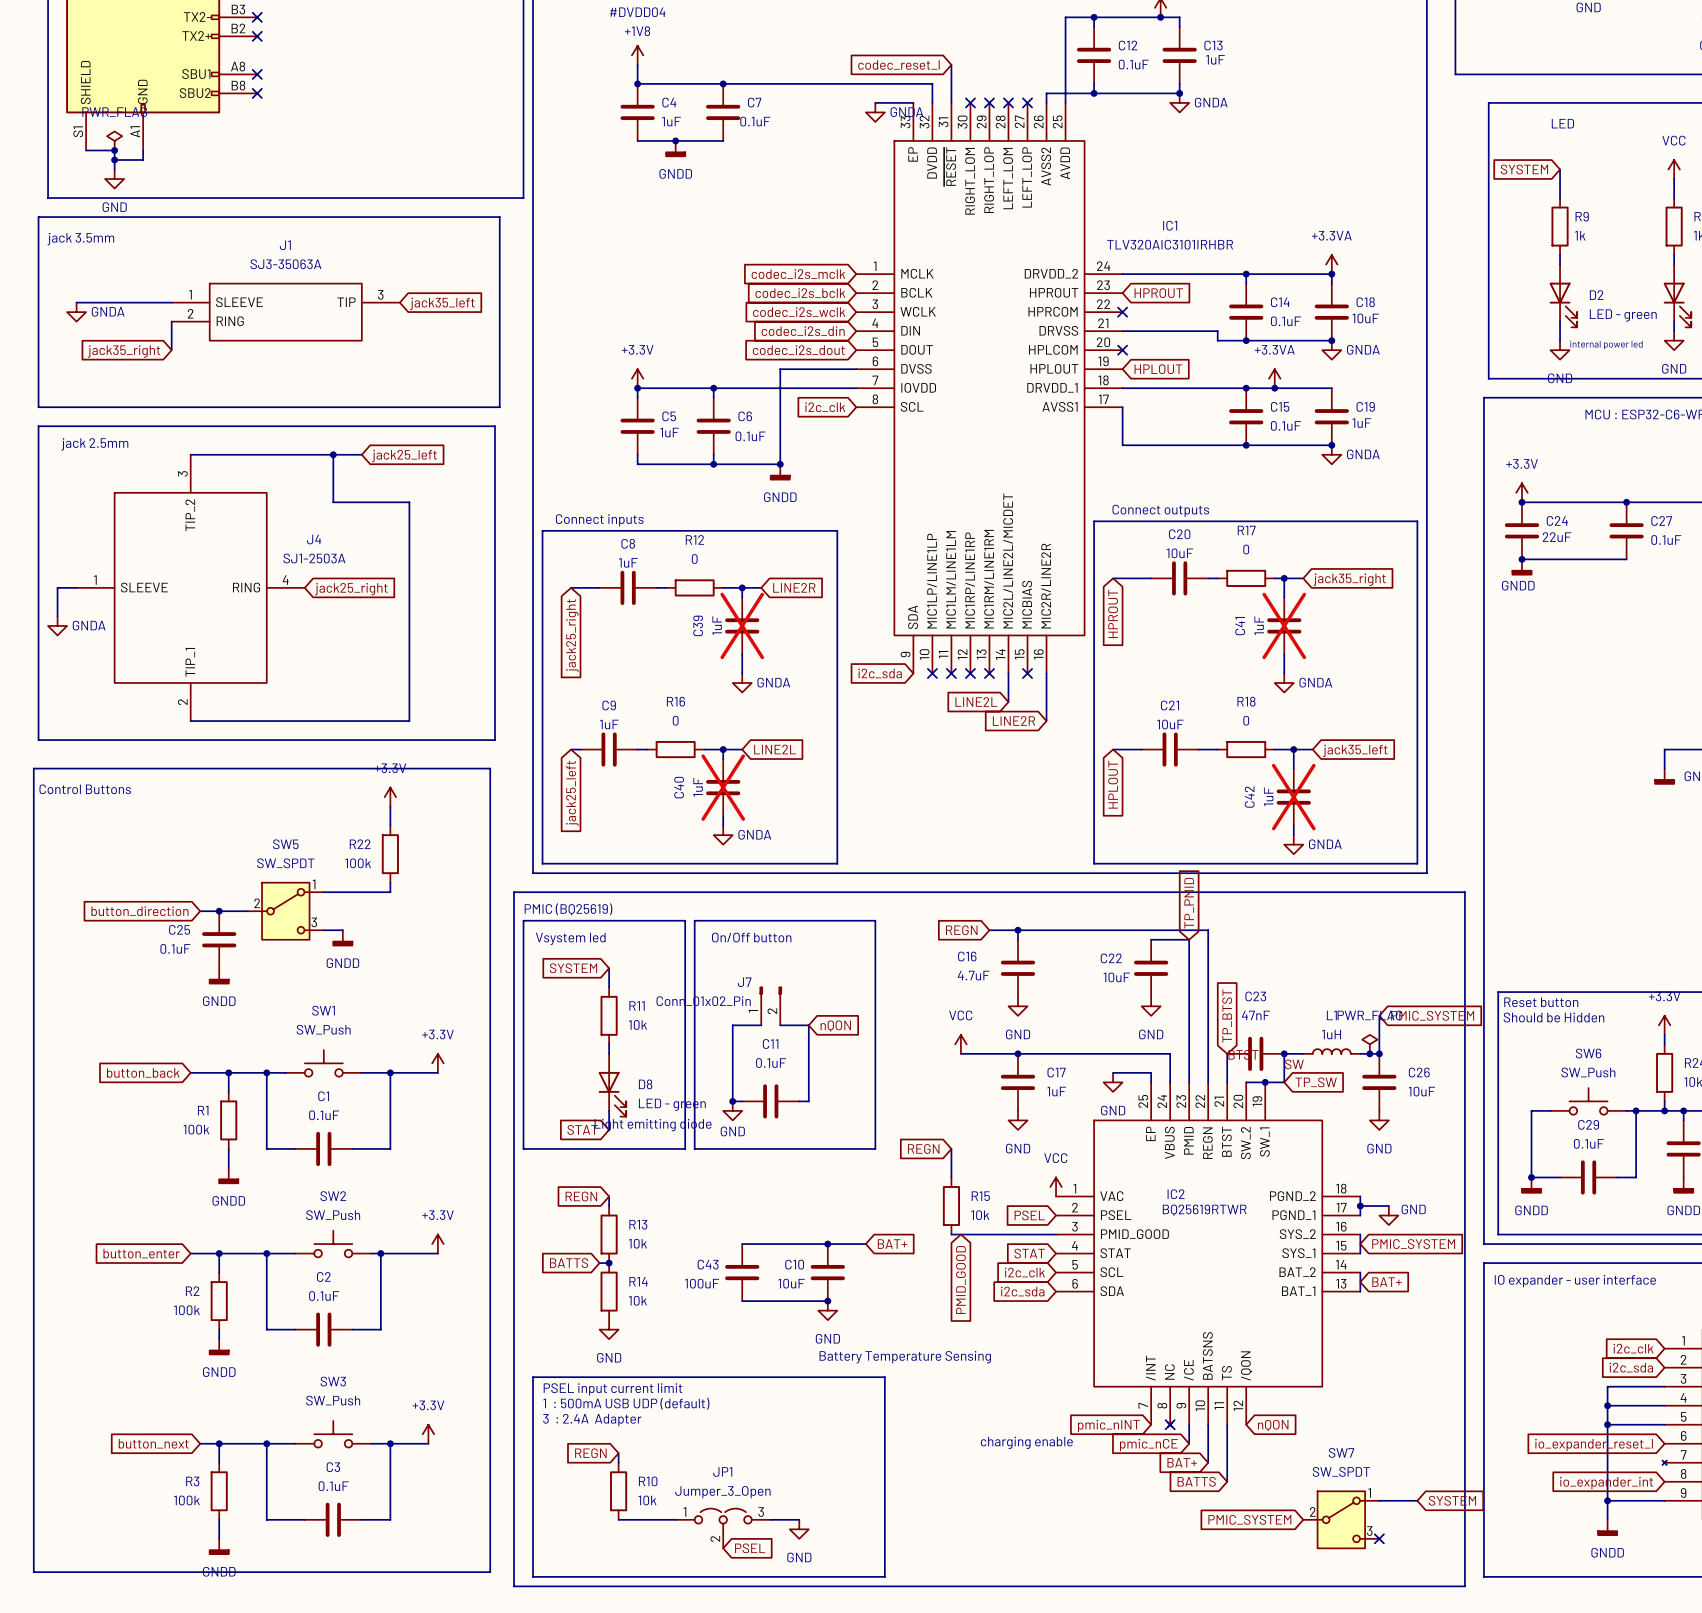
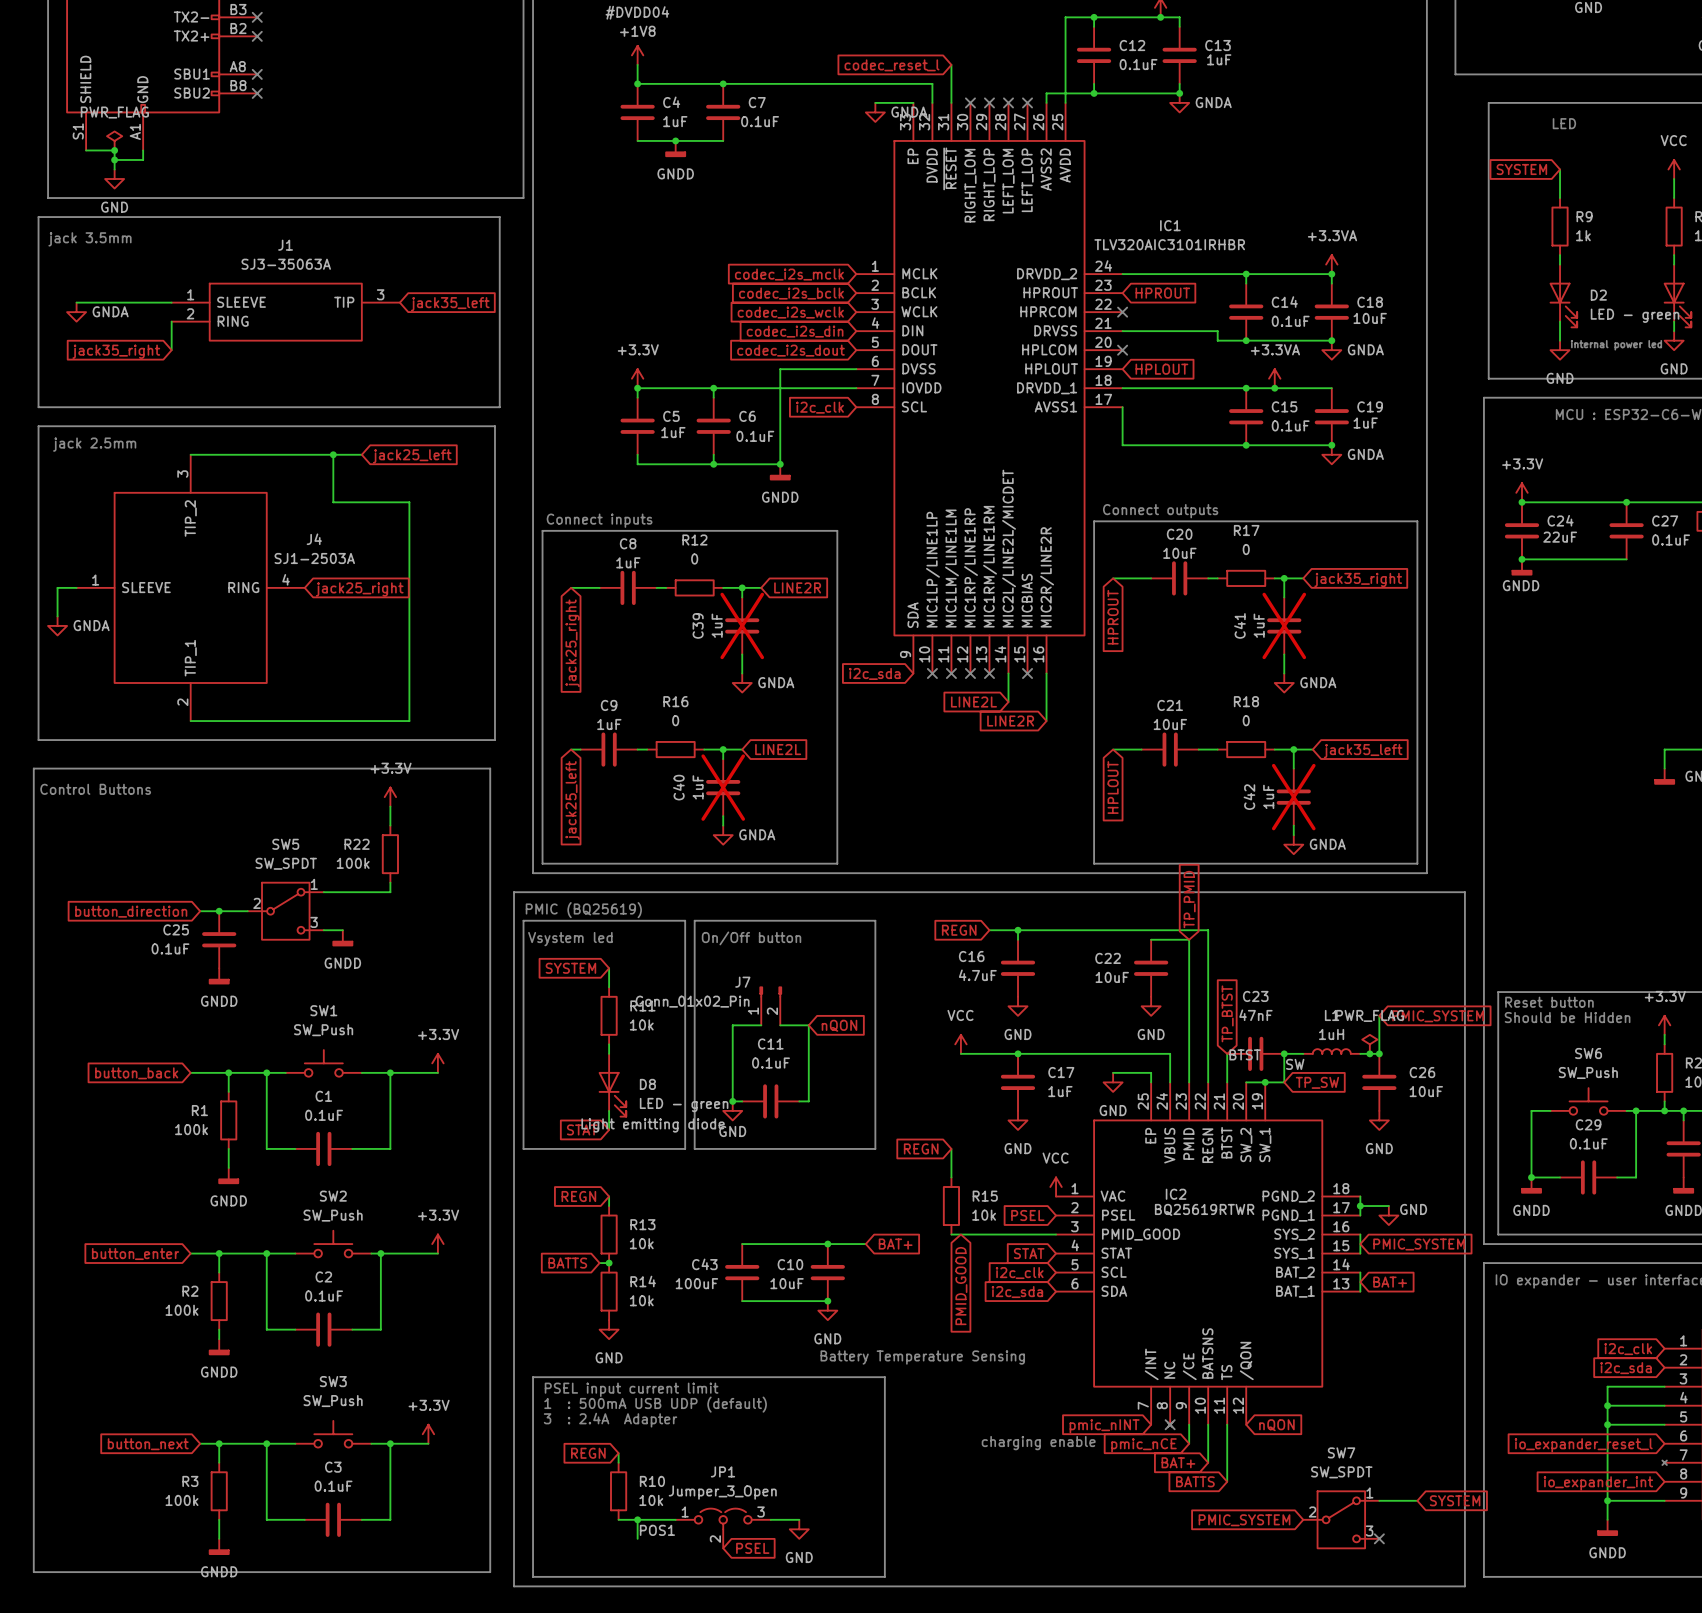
wire: none -> (637, 1519) (637, 1538)
junction: none -> (637, 1519)
label: none -> POS1 (657, 1530)

